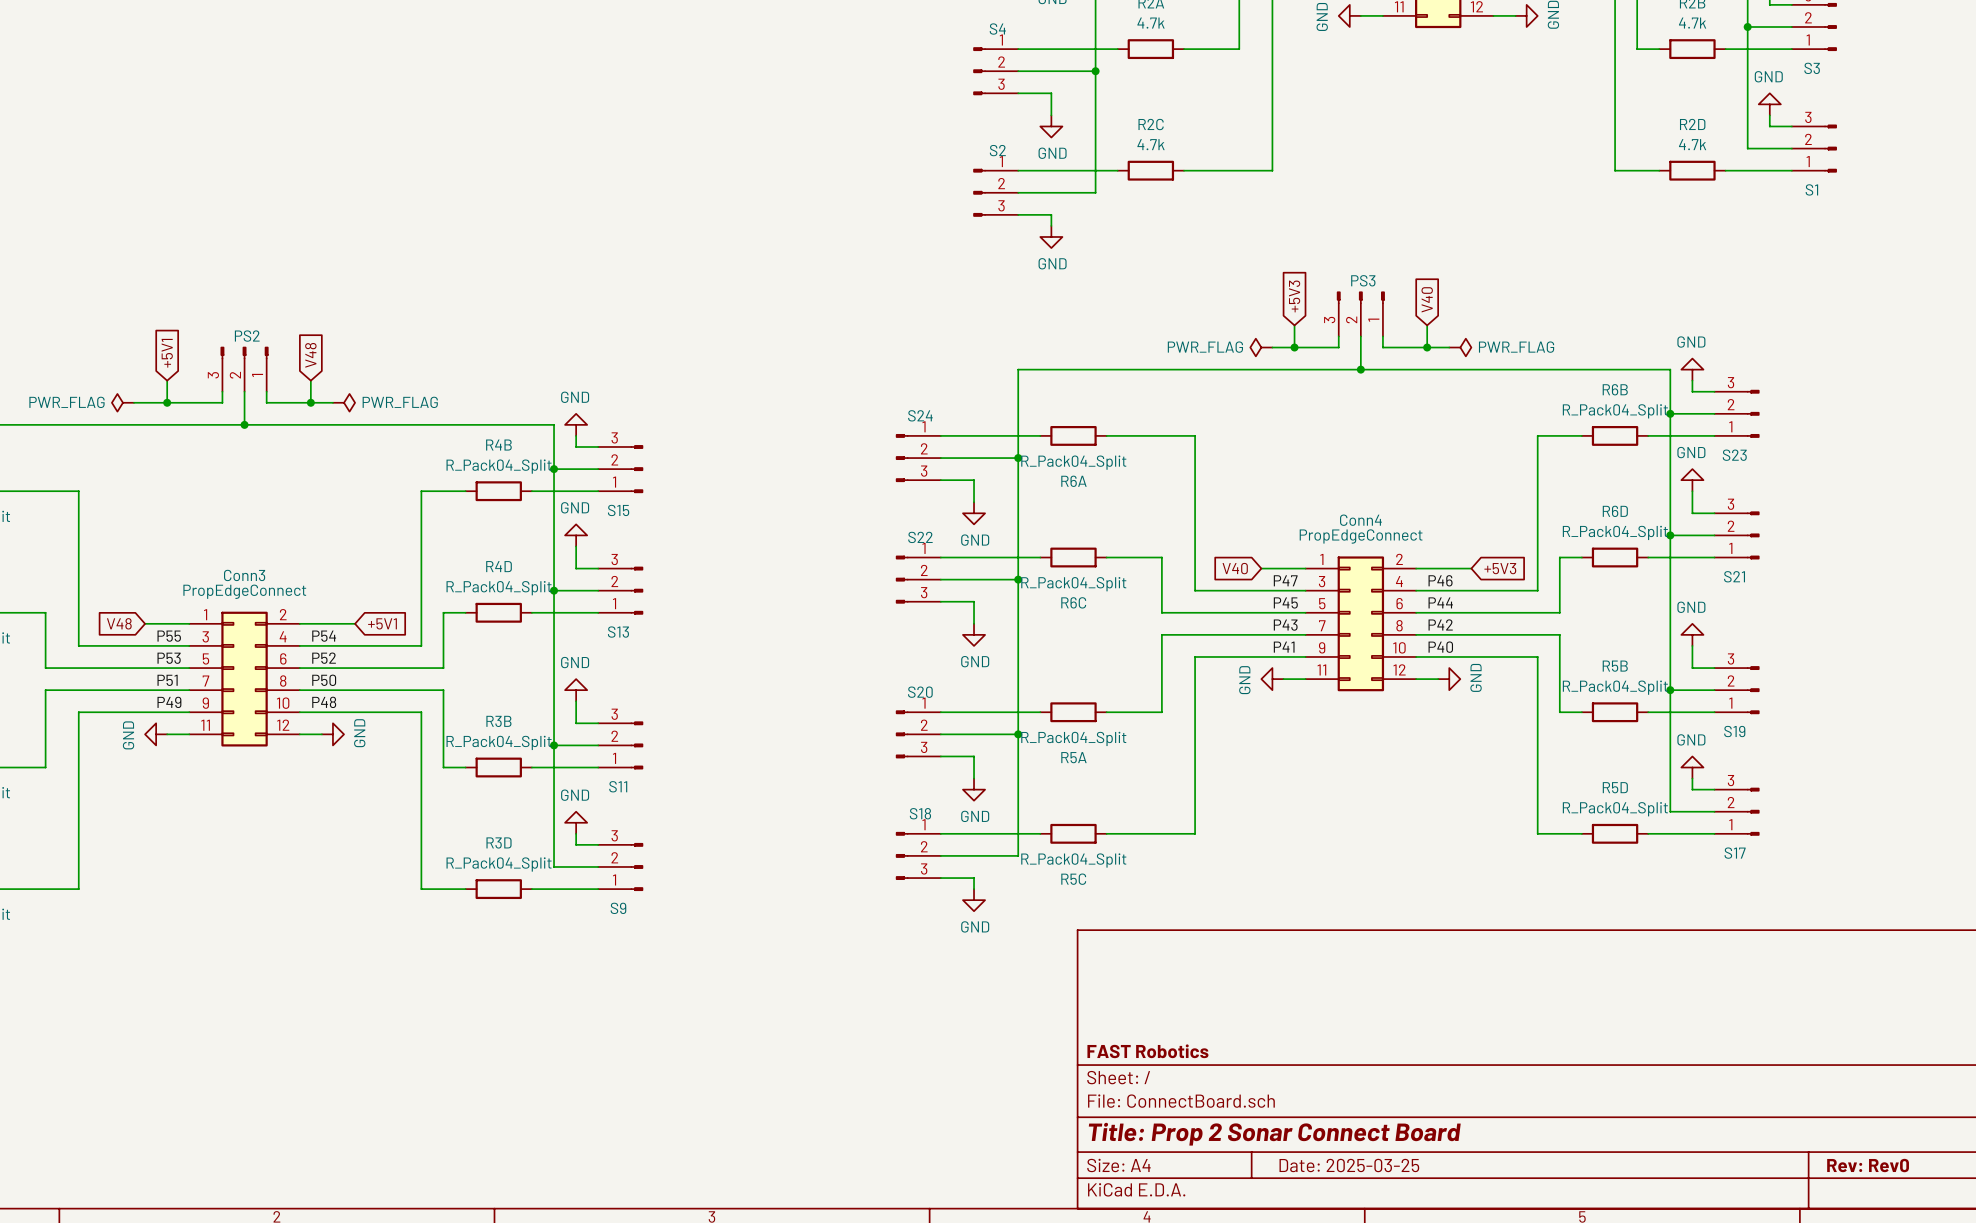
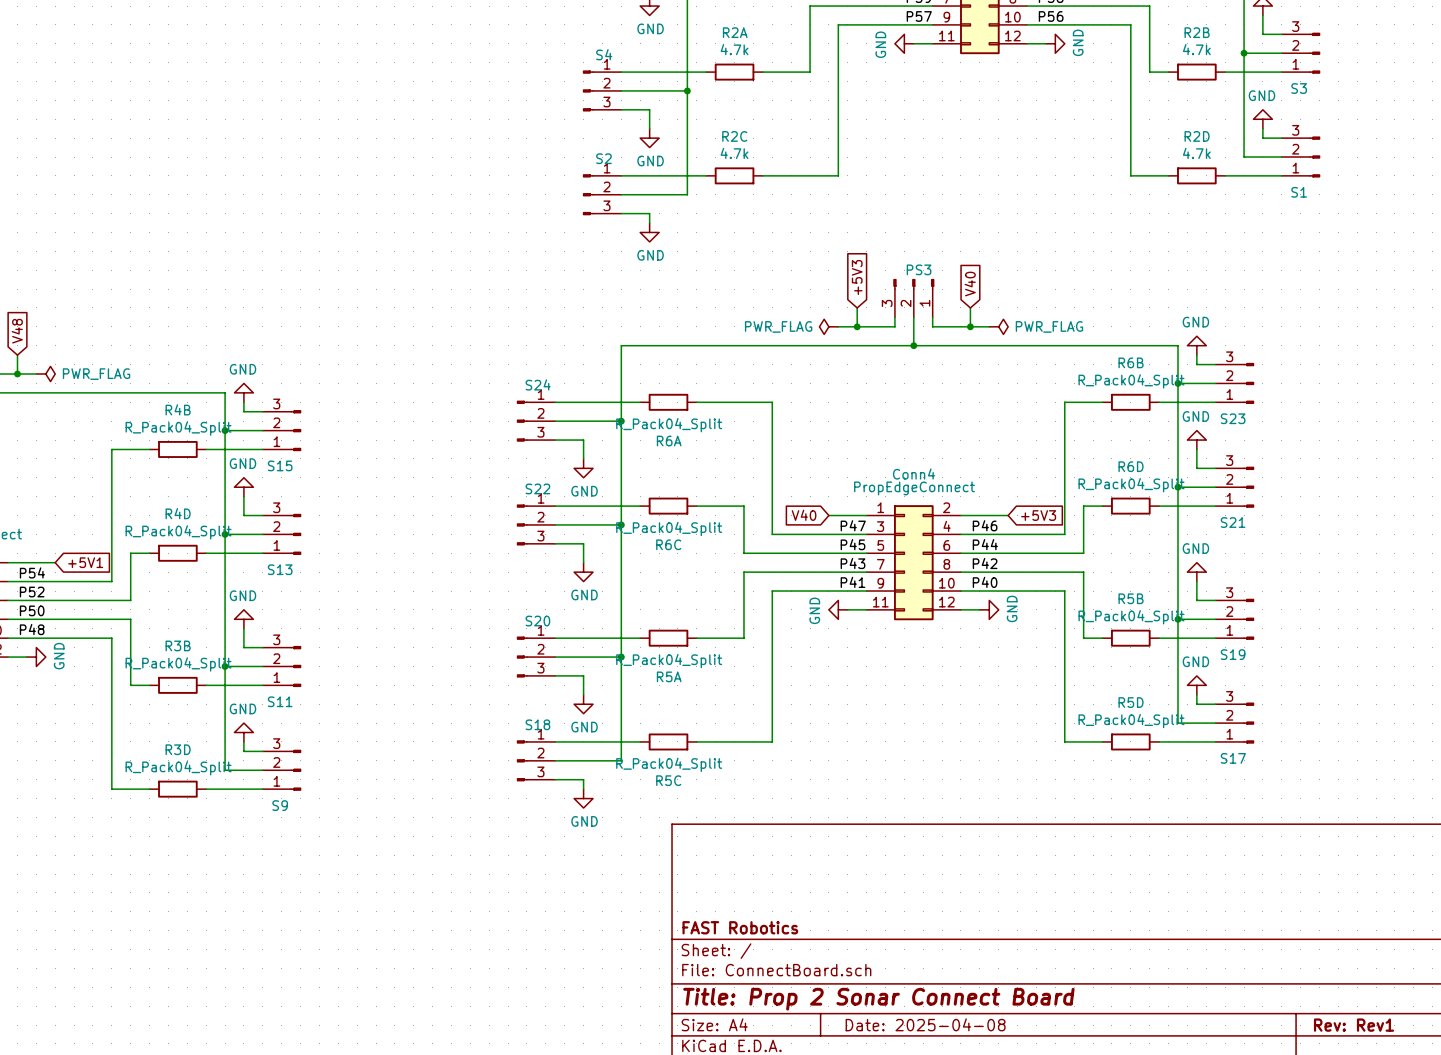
title block: Date: 2025-03-25 (1349, 1165) -> Date: 2025-04-08 (925, 1024)
title block: Rev: Rev0 (1868, 1165) -> Rev: Rev1 (1354, 1025)

